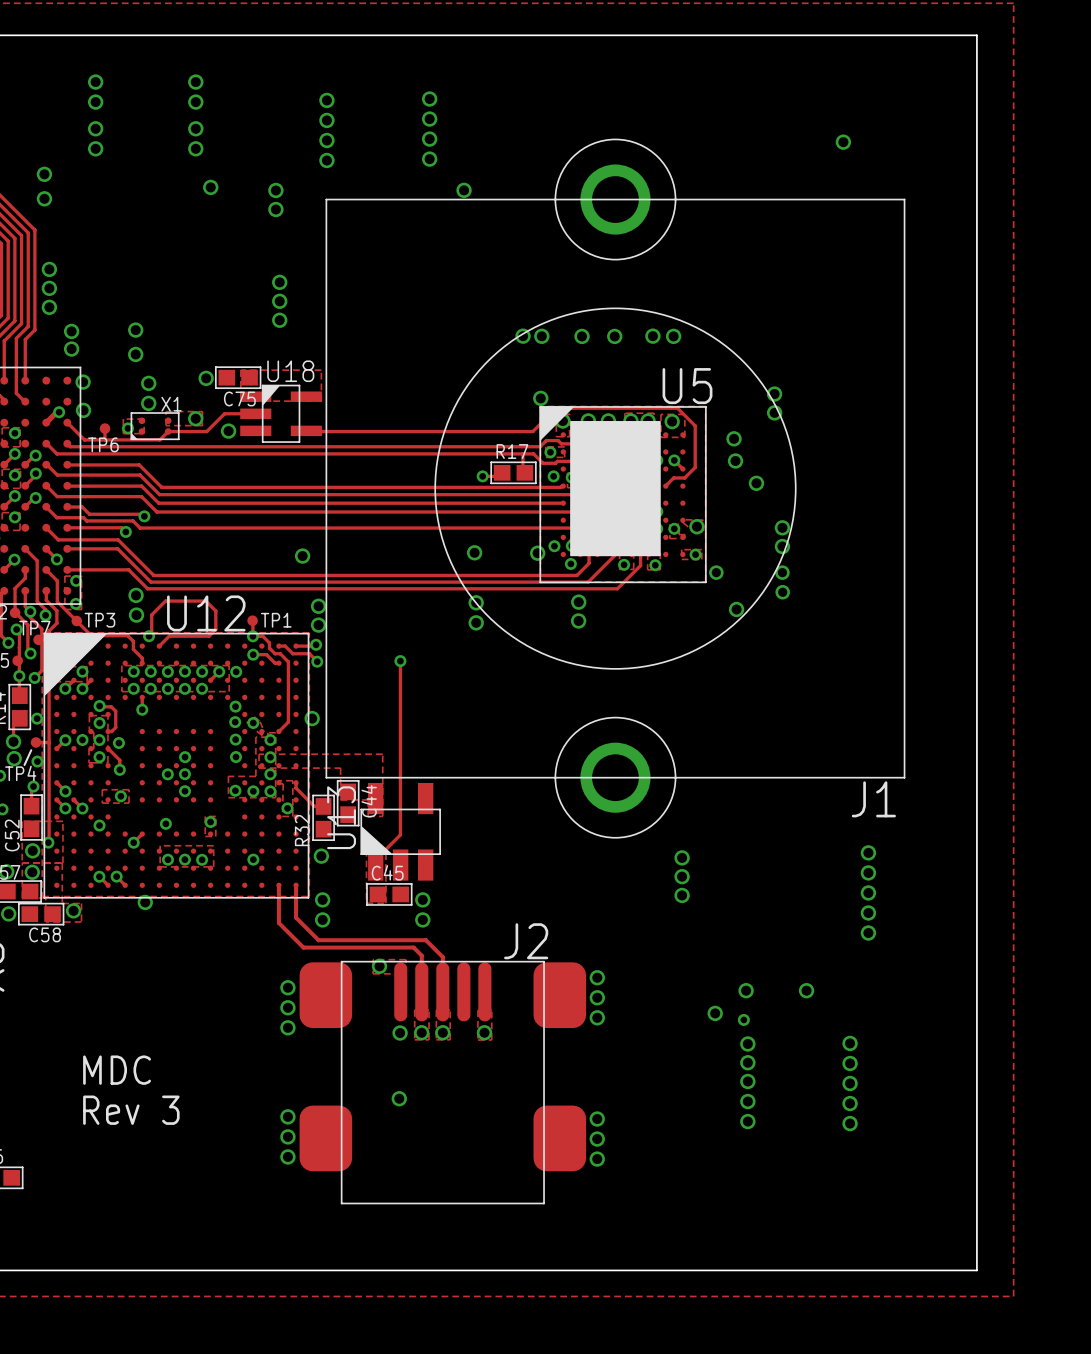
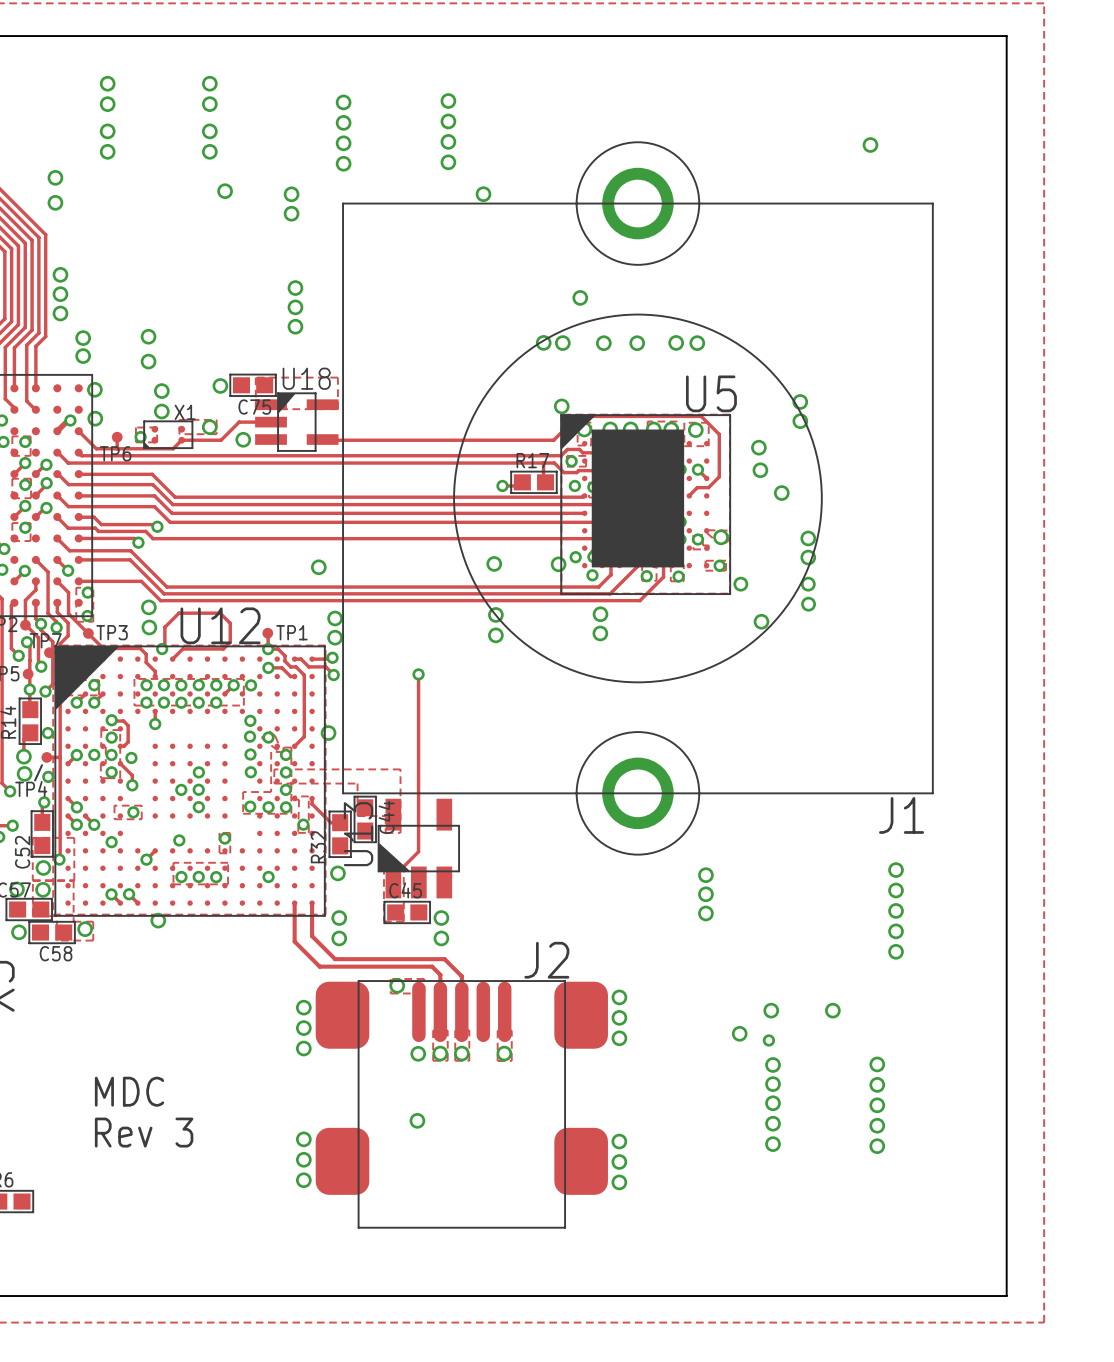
via: none -> (580, 297)

